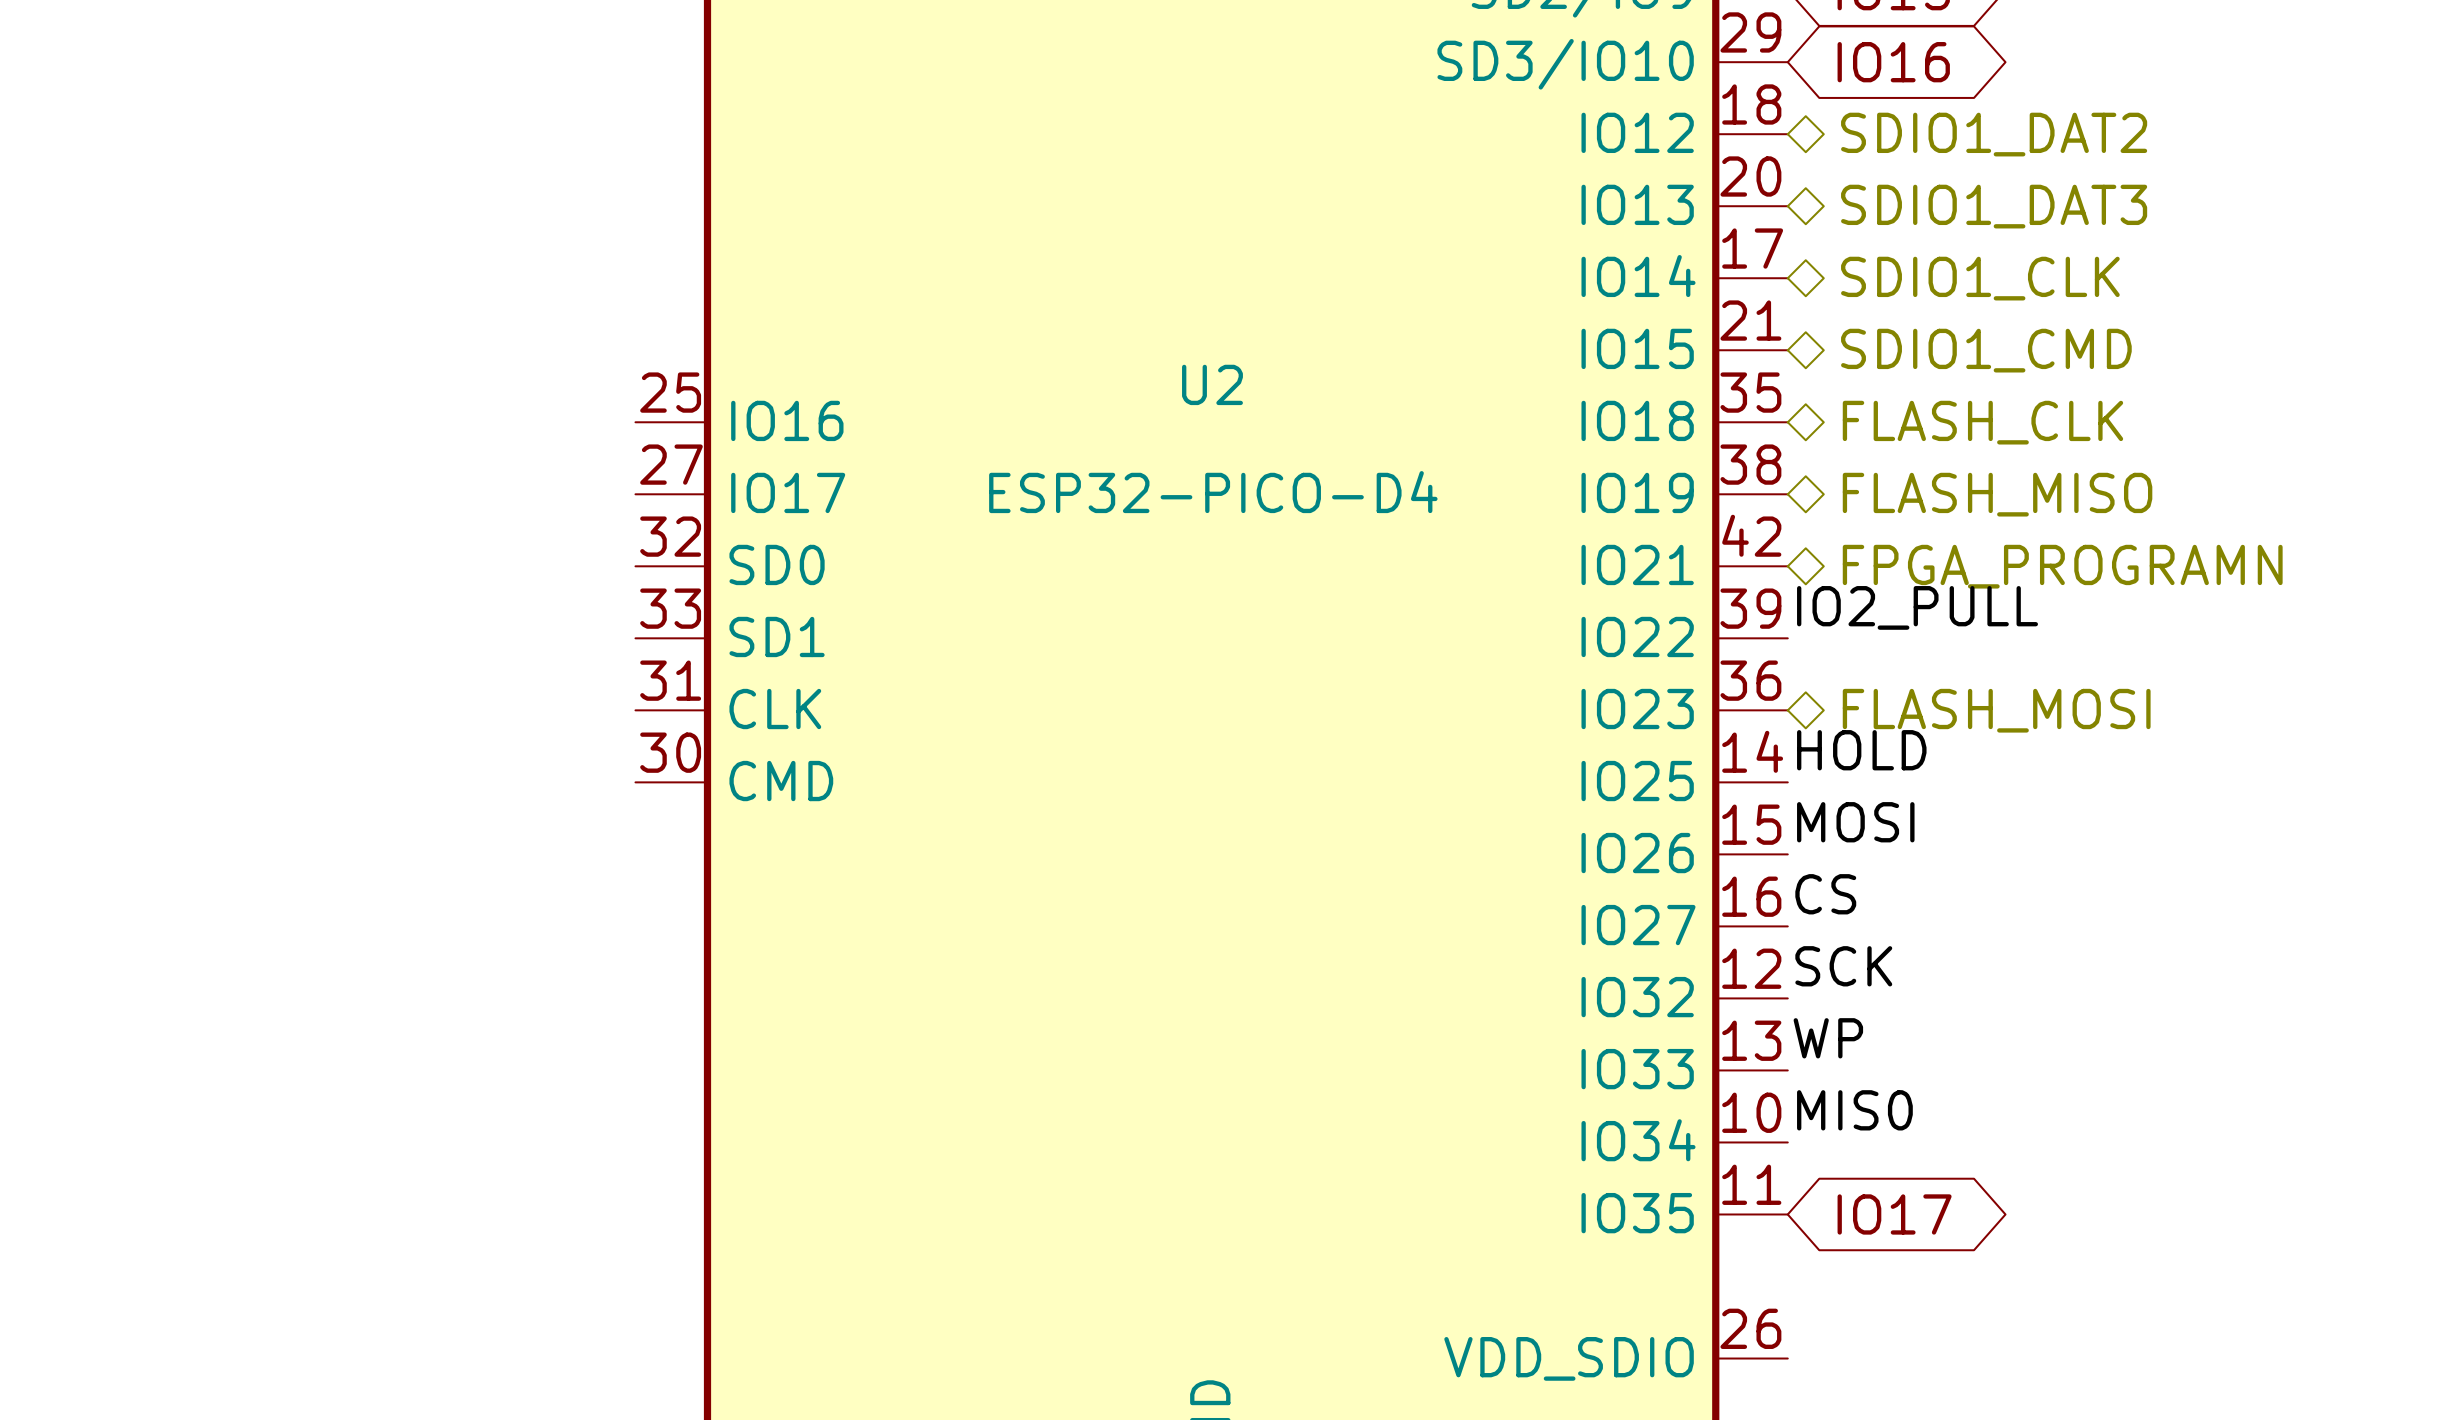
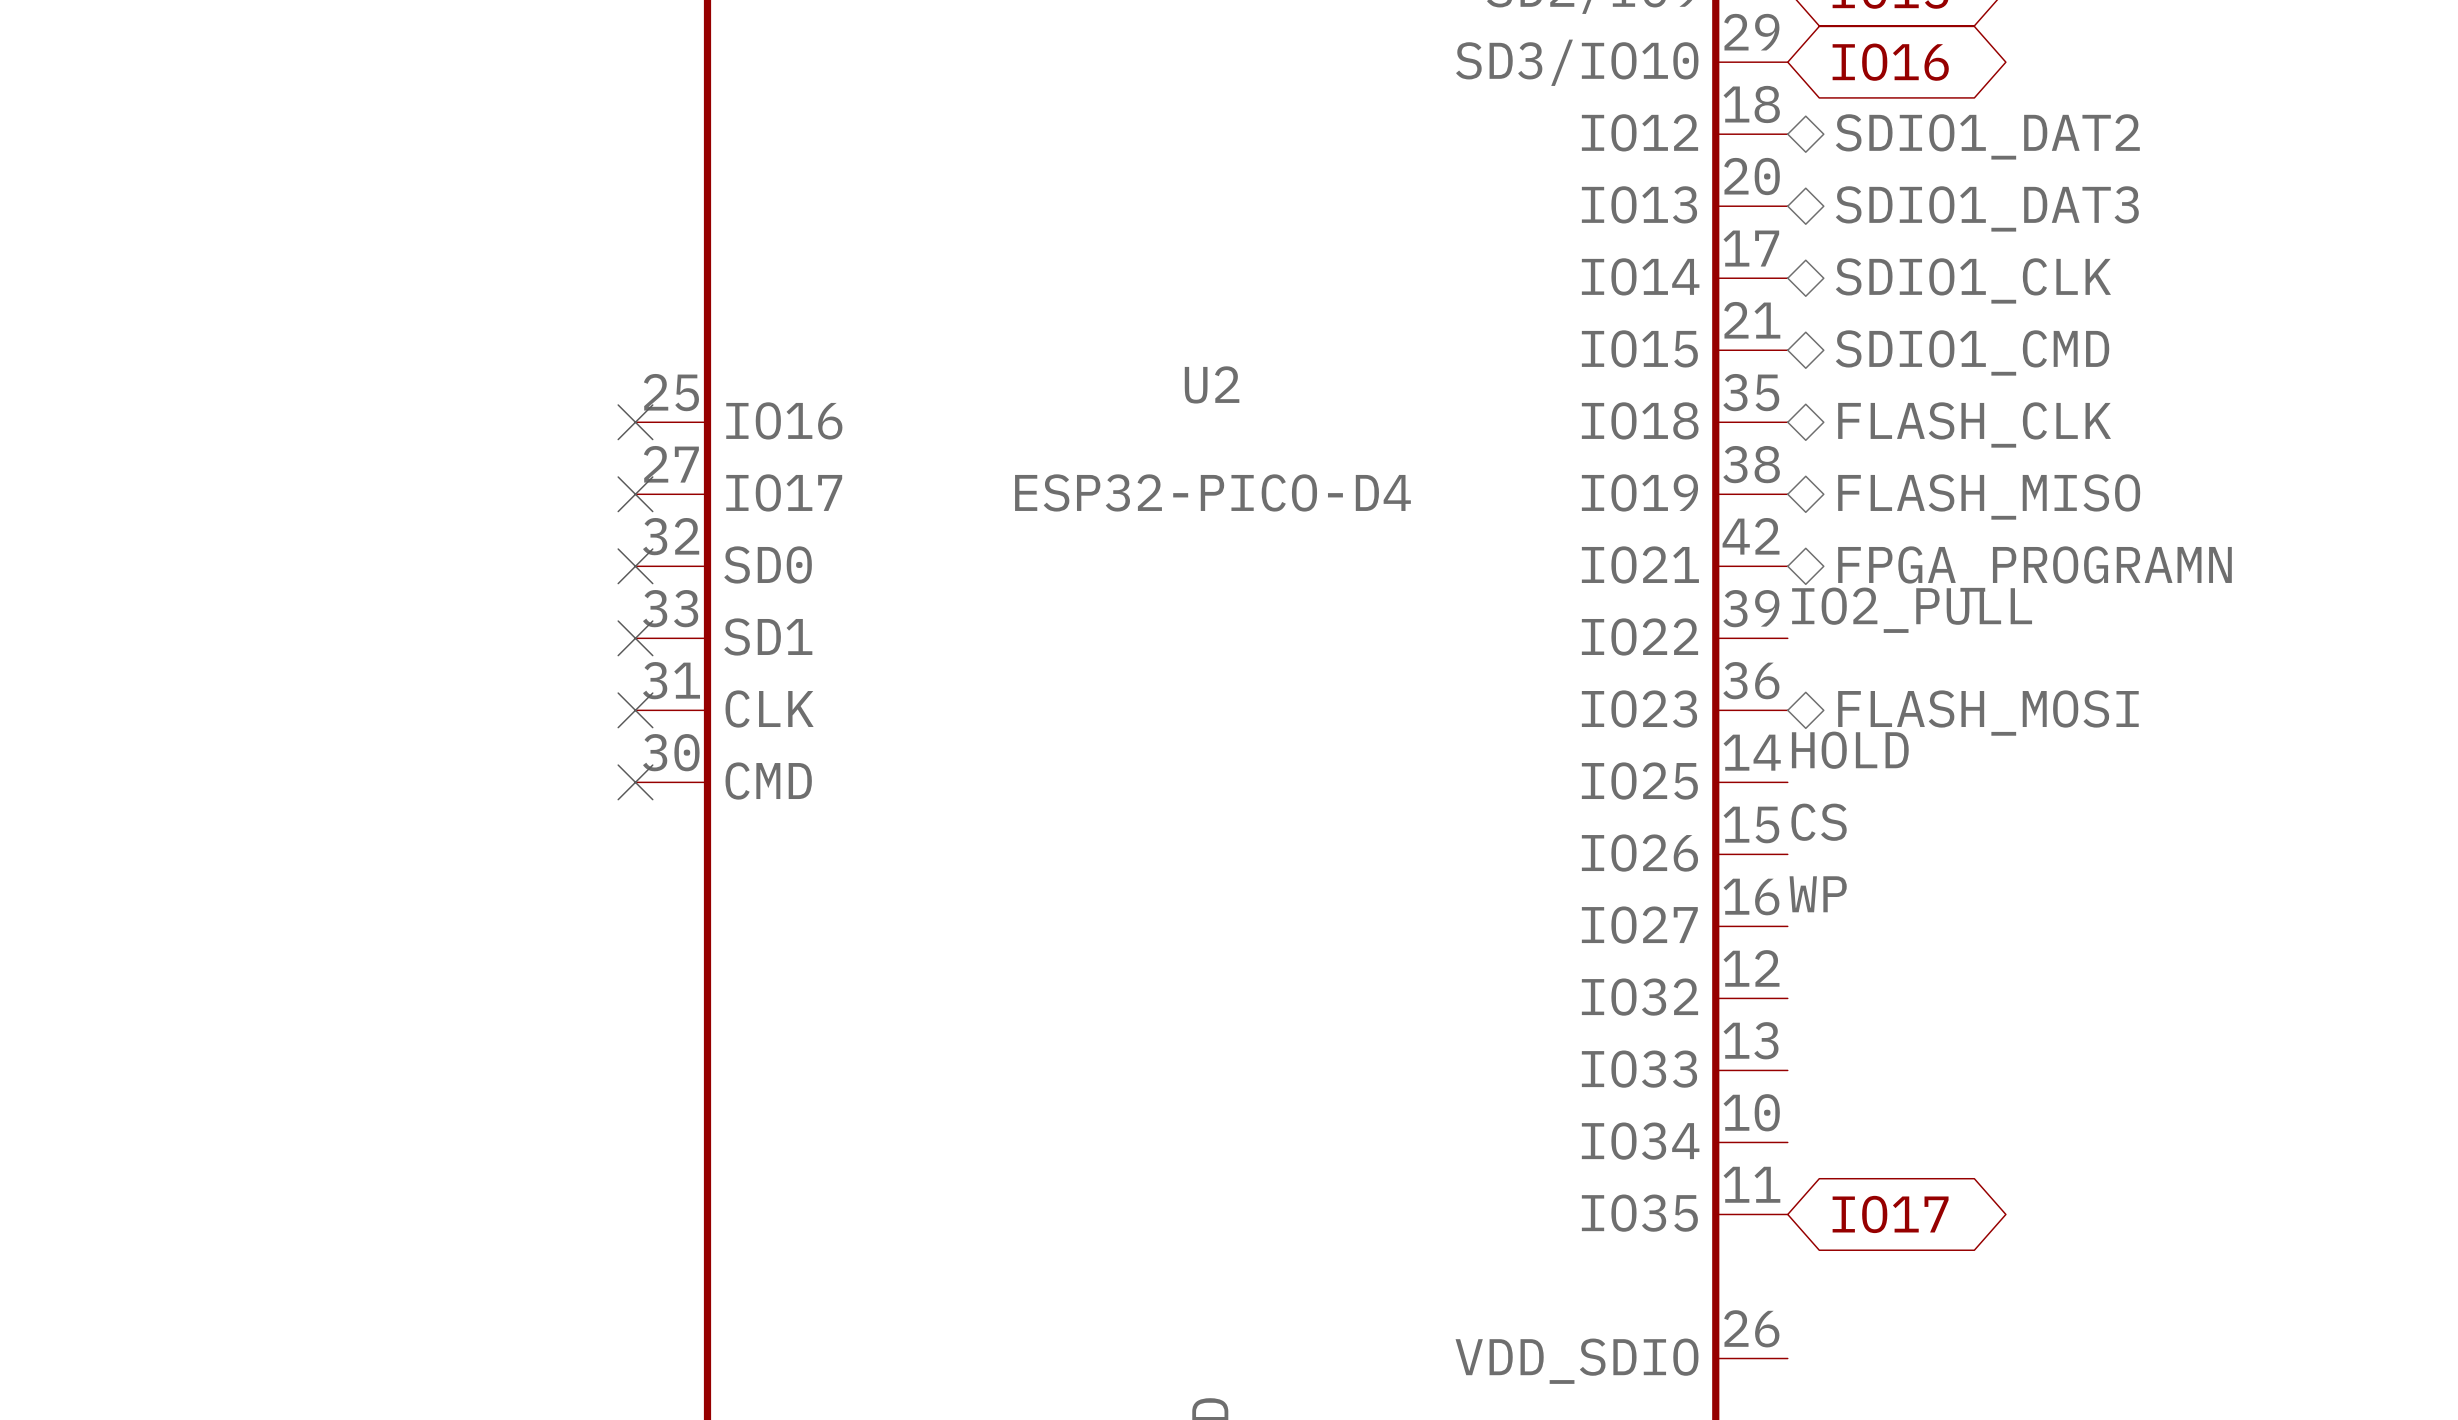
no-connect mark: none -> (635, 422)
no-connect mark: none -> (635, 494)
no-connect mark: none -> (635, 566)
no-connect mark: none -> (635, 638)
no-connect mark: none -> (635, 710)
no-connect mark: none -> (635, 782)
label: MOSI (1855, 822) -> CS (1819, 822)
label: CS (1825, 894) -> WP (1818, 894)
label: SCK (1843, 966) -> none
label: WP (1828, 1038) -> none
label: MIS0 (1854, 1110) -> none

